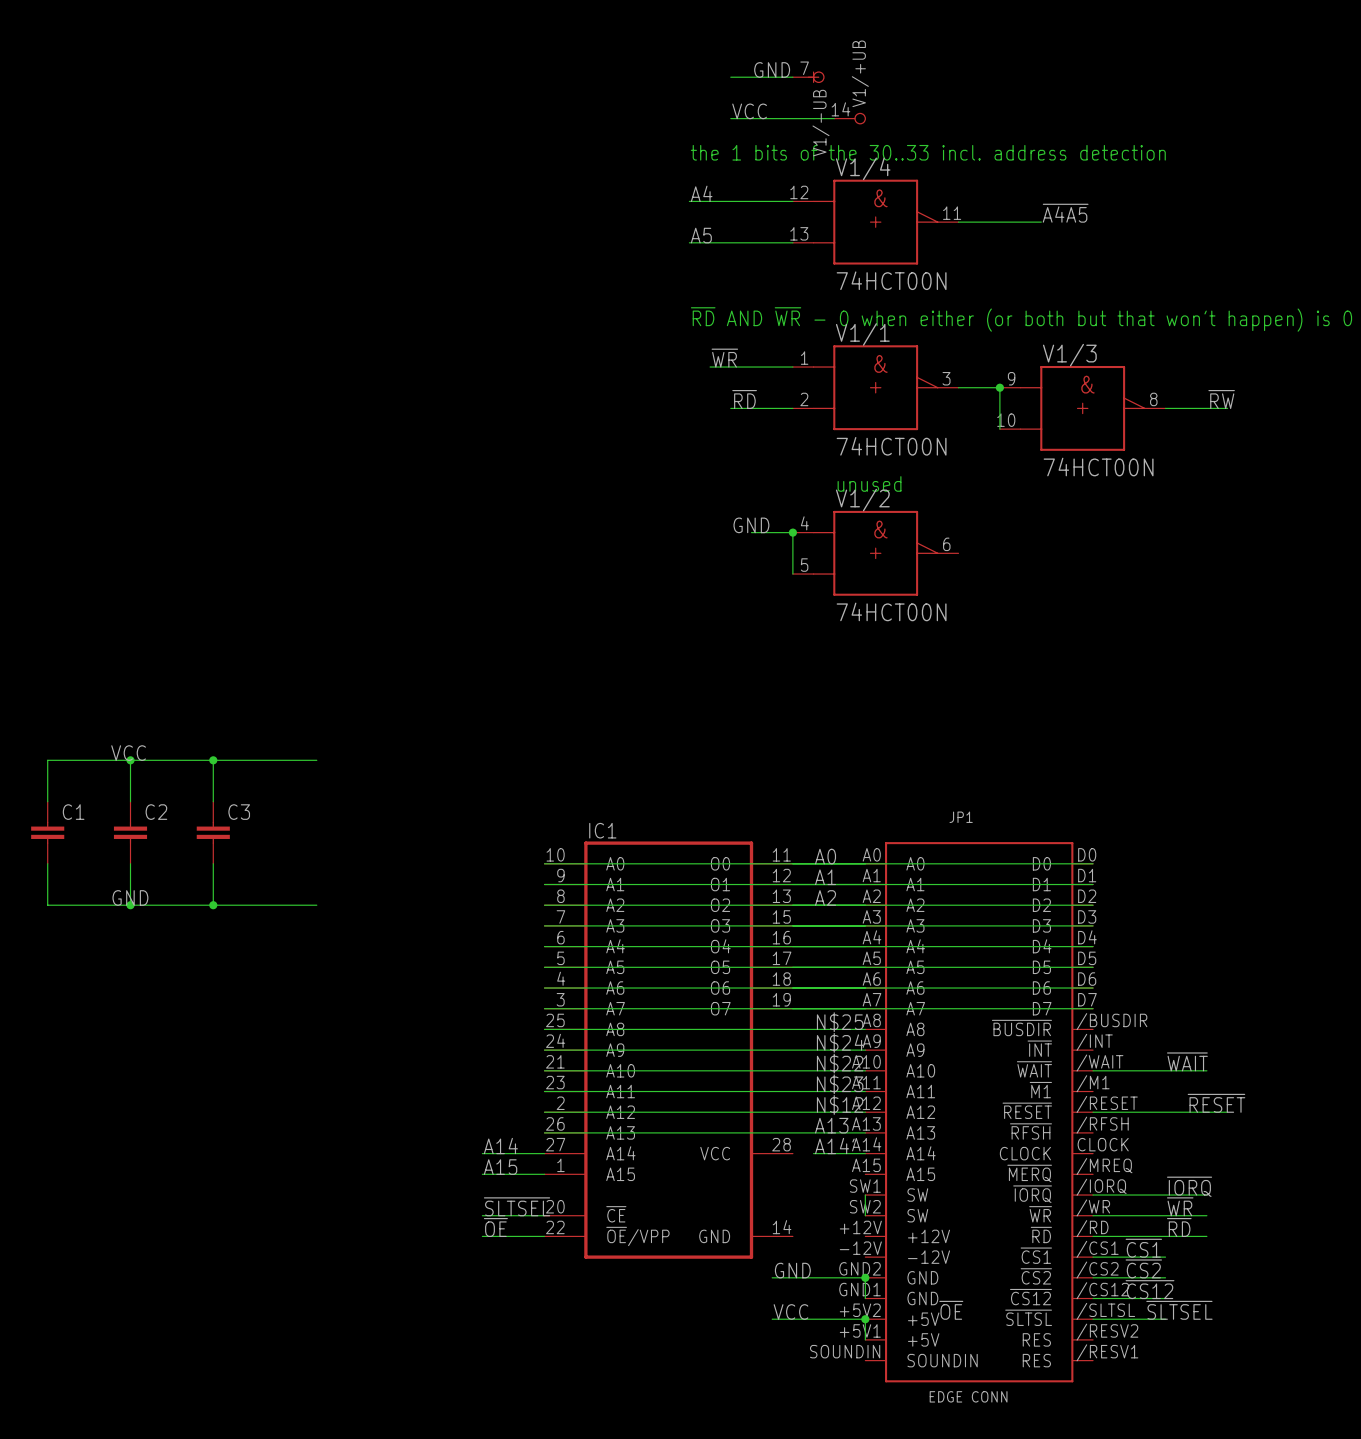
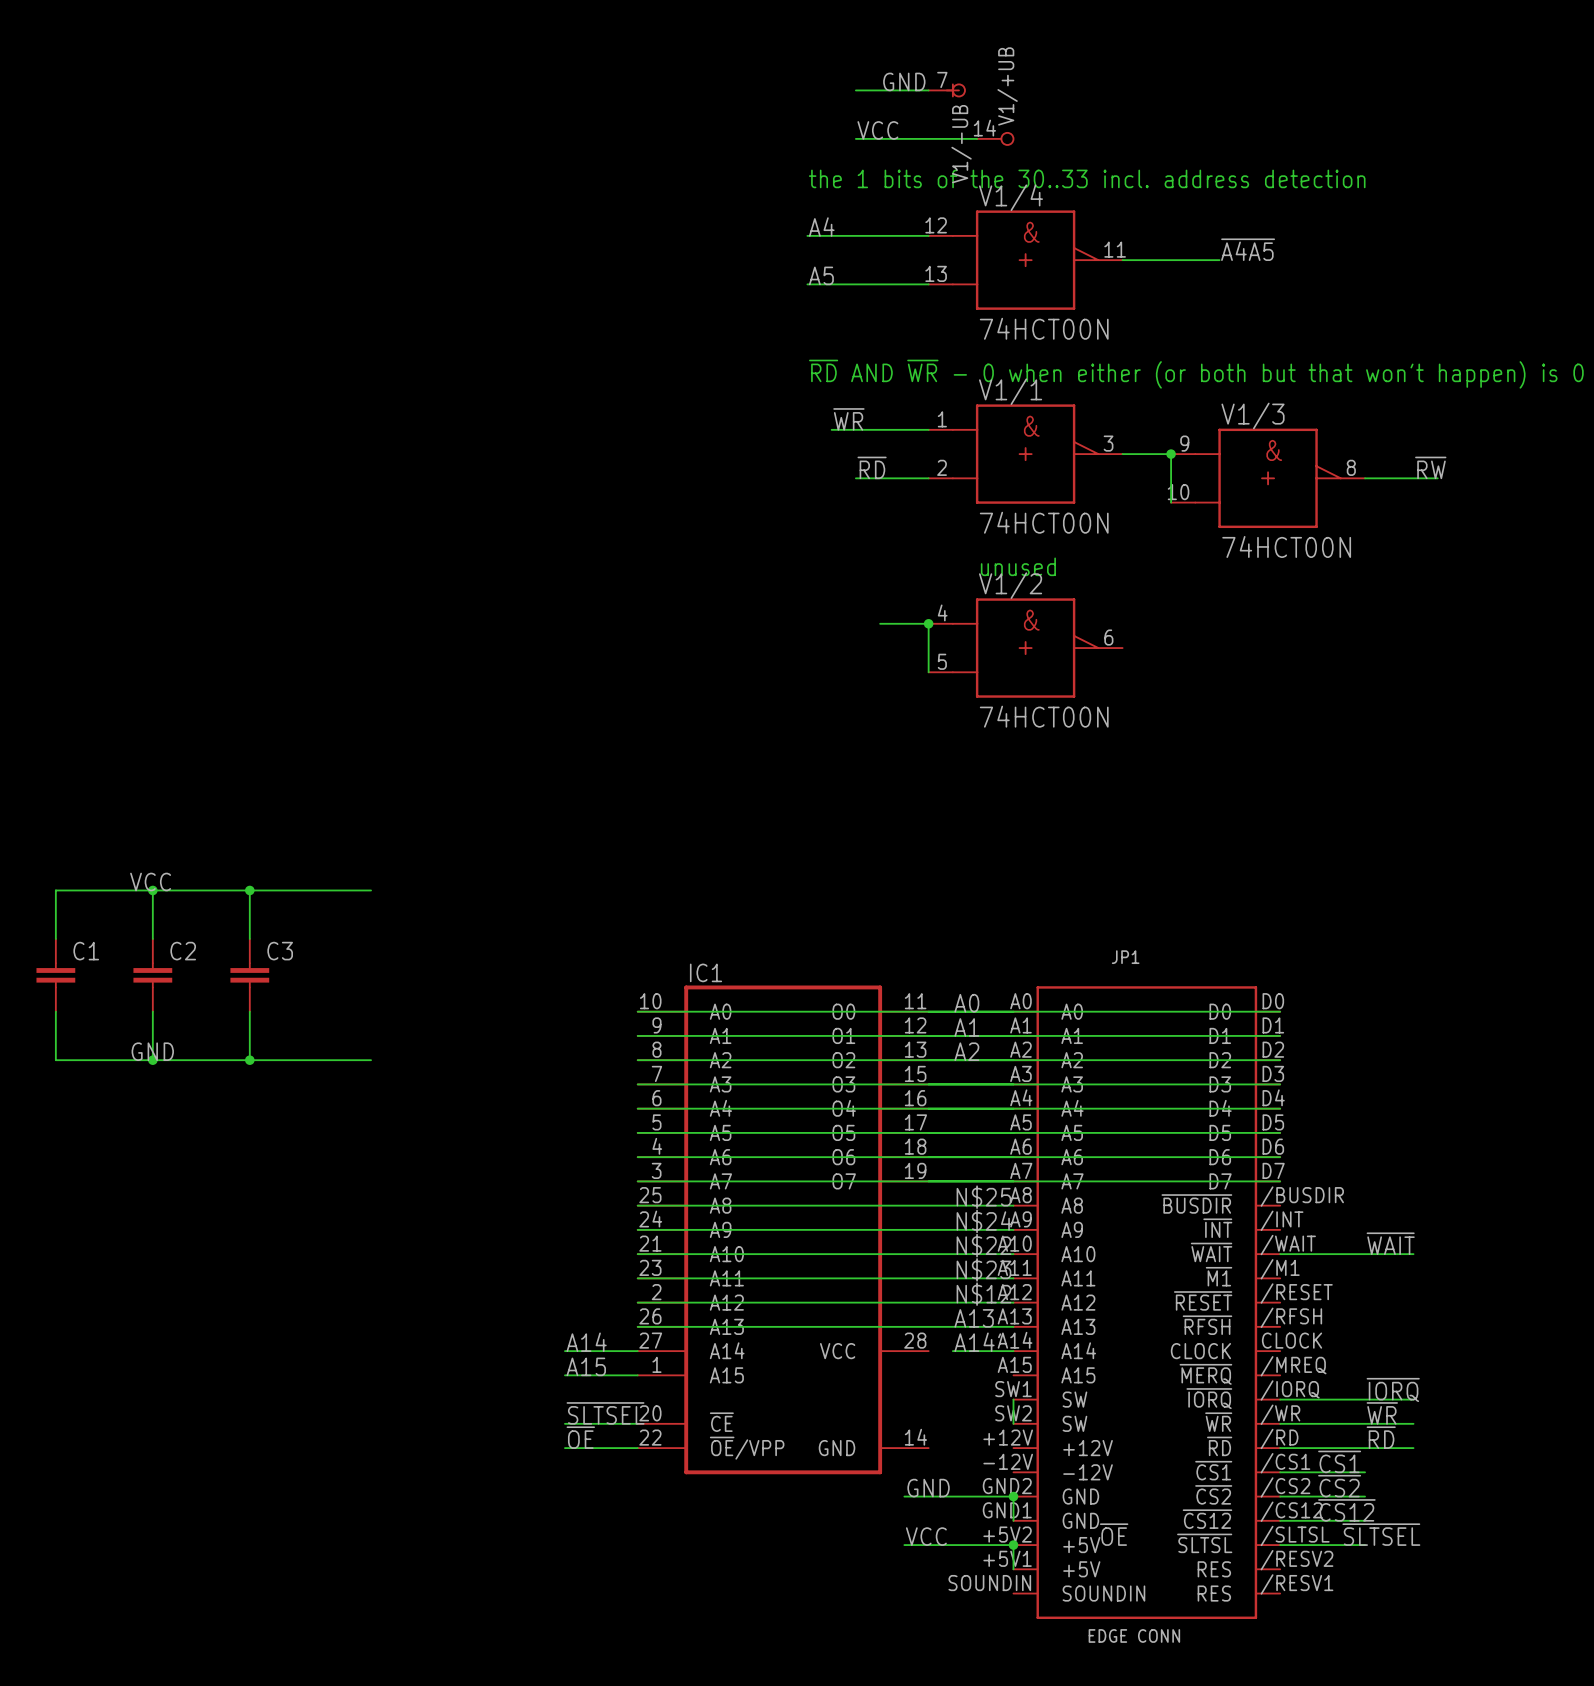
label: GND (751, 525) -> none
label: ~{RESET} (1216, 1103) -> none
wire: (1093, 1112) (1227, 1112) -> none

